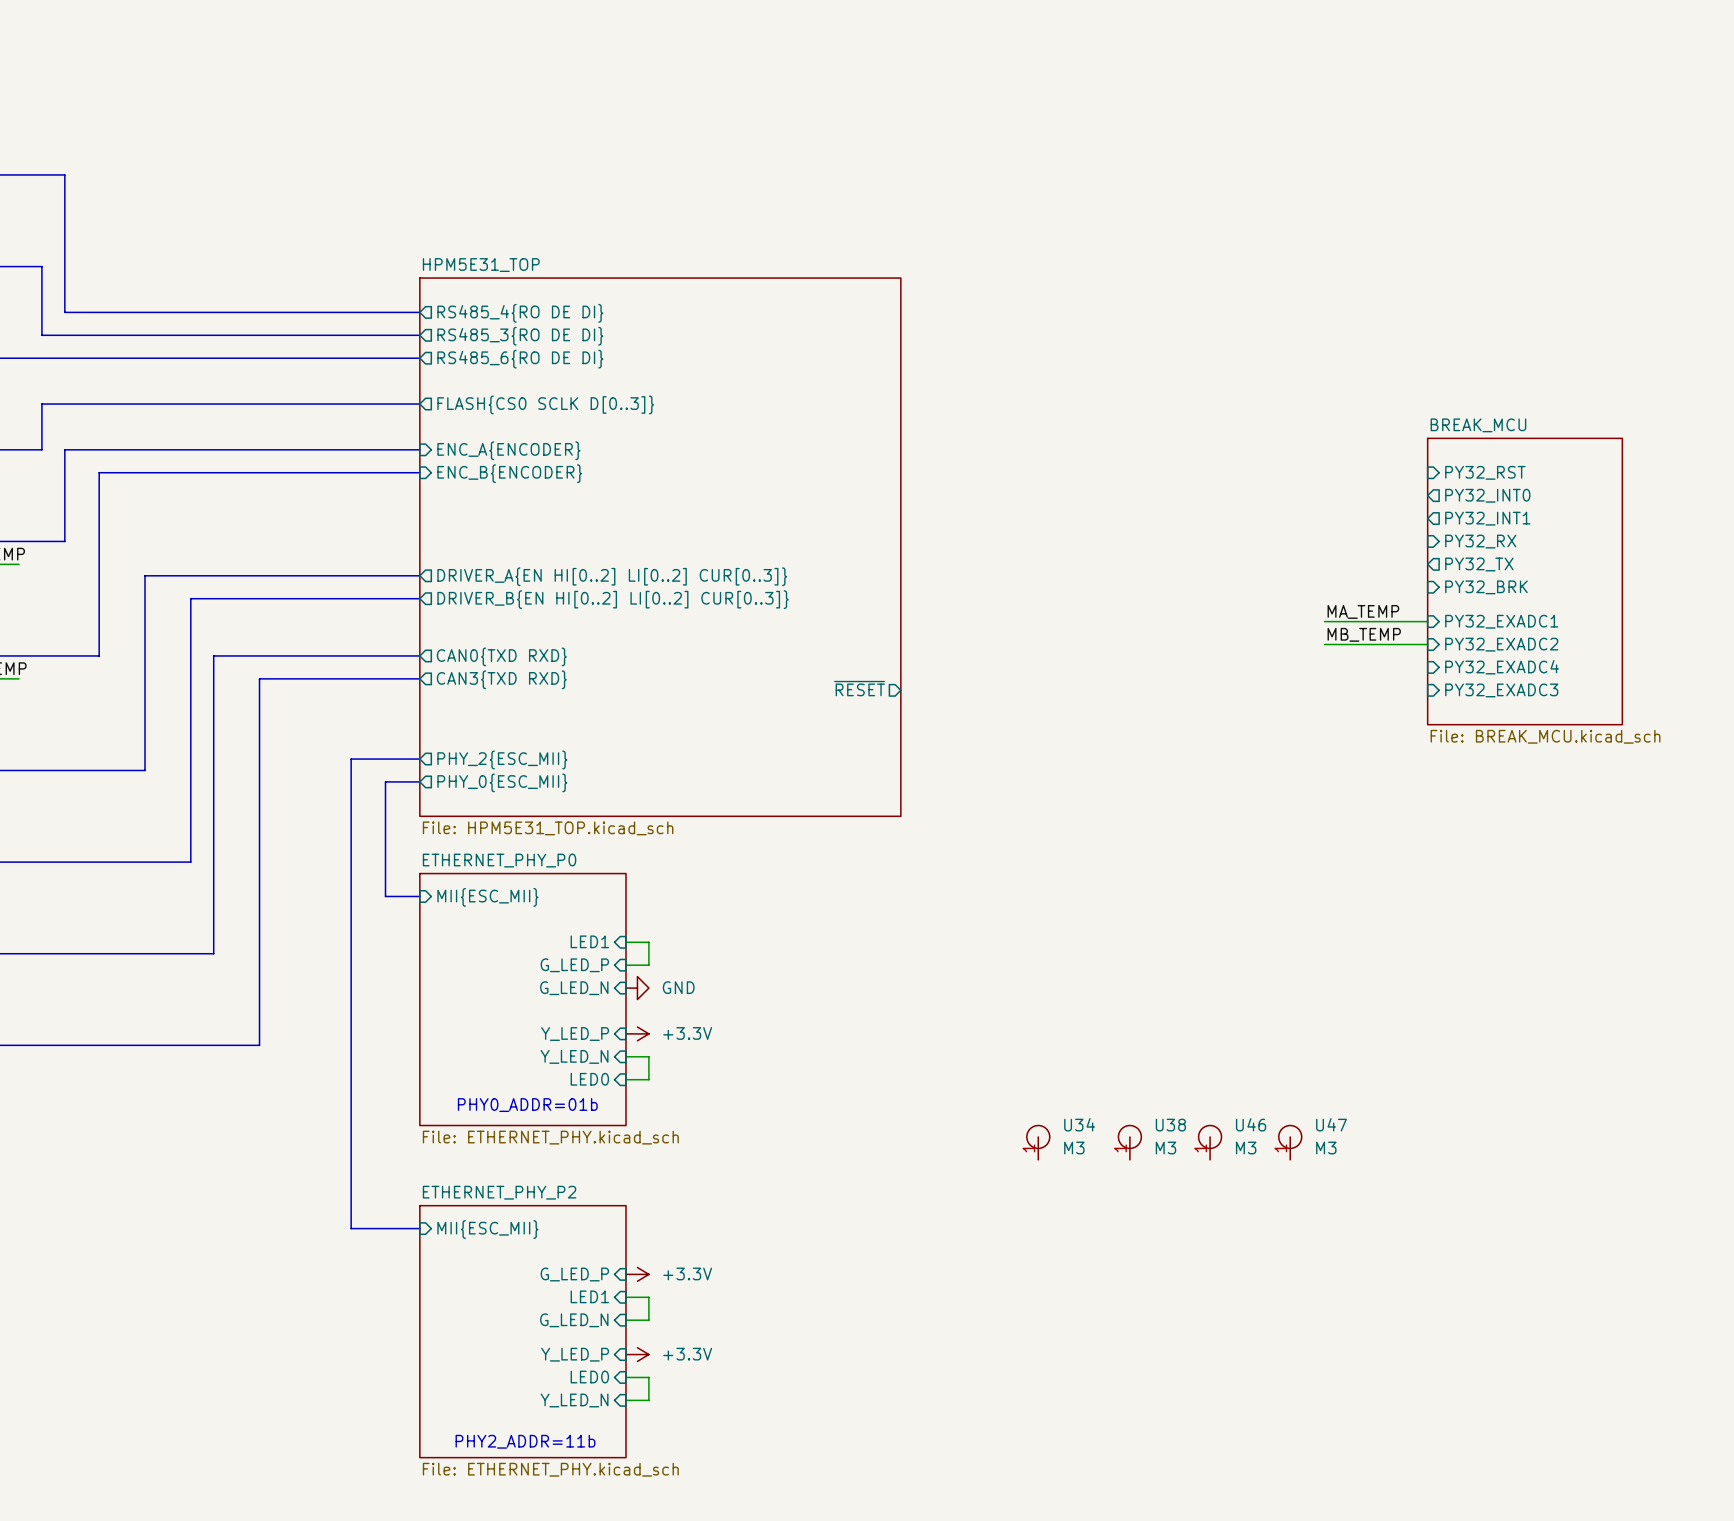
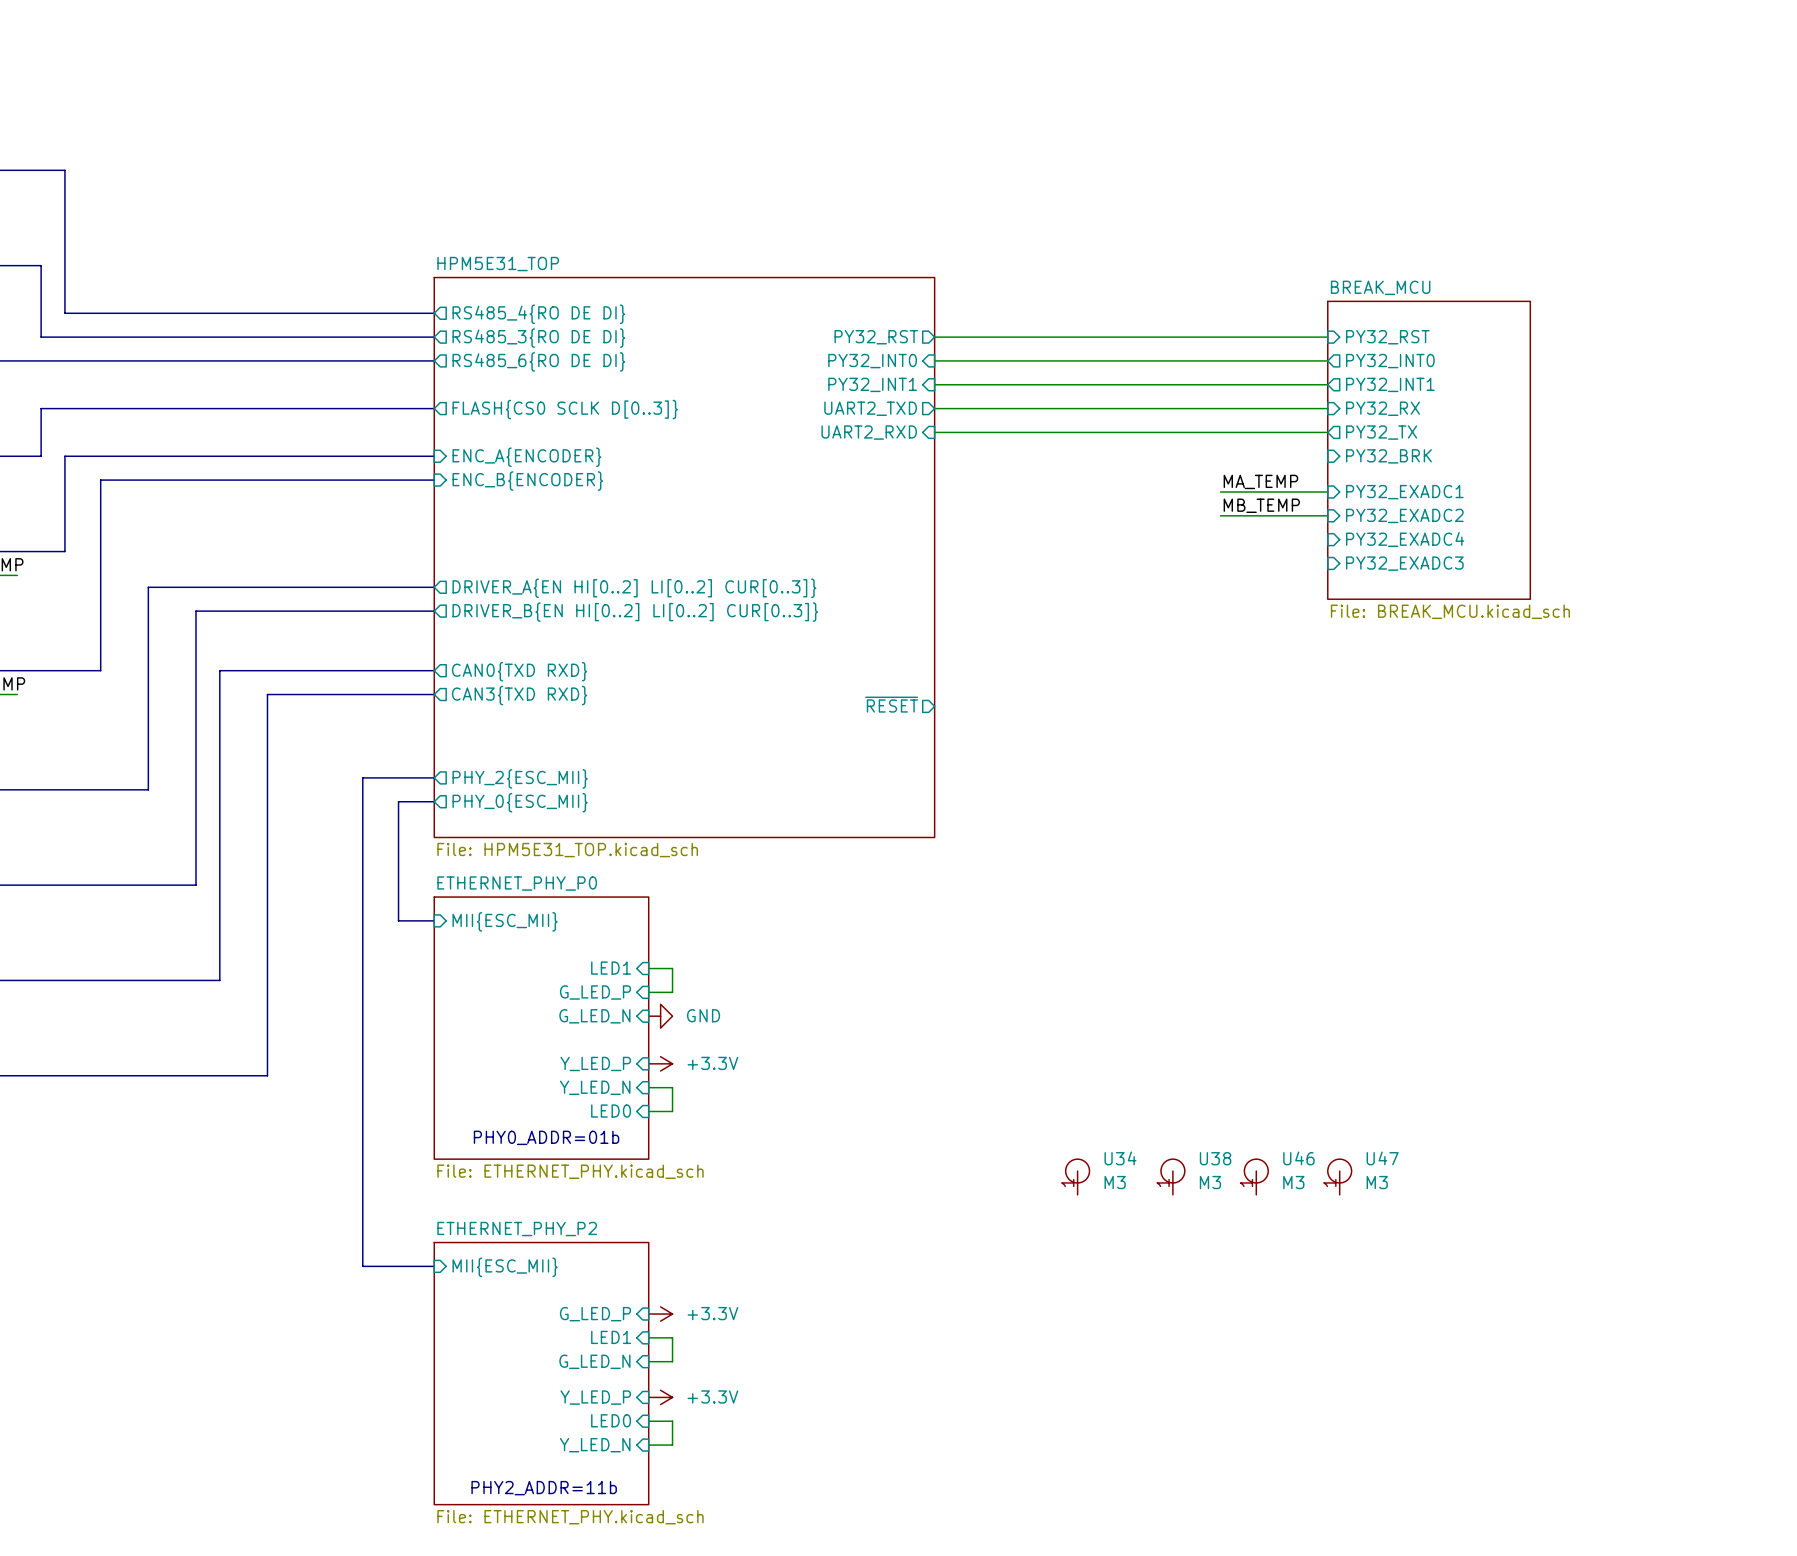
sheet pin: none -> PY32_RST (876, 337)
wire: none -> (934, 337) (1327, 337)
sheet pin: none -> PY32_INT0 (872, 361)
wire: none -> (934, 360) (1327, 360)
sheet pin: none -> PY32_INT1 (872, 384)
wire: none -> (934, 384) (1327, 384)
sheet pin: none -> UART2_TXD (870, 408)
wire: none -> (934, 408) (1327, 408)
wire: none -> (934, 432) (1327, 432)
sheet pin: none -> UART2_RXD (869, 432)
sheet pin position: PY32_RST (1485, 472) -> PY32_RST (1387, 337)
sheet pin position: PY32_INT0 (1487, 495) -> PY32_INT0 (1390, 361)
sheet pin position: PY32_INT1 (1487, 518) -> PY32_INT1 (1390, 384)
sheet pin position: PY32_RX (1480, 541) -> PY32_RX (1383, 408)
sheet pin position: PY32_TX (1479, 564) -> PY32_TX (1381, 432)
sheet BREAK_MCU position: (1525, 581) -> (1429, 450)
sheet pin position: PY32_BRK (1486, 587) -> PY32_BRK (1388, 456)
label position: MA_TEMP (1363, 611) -> MA_TEMP (1260, 481)
wire: (1324, 621) (1427, 621) -> (1220, 491) (1327, 491)
sheet pin position: PY32_EXADC1 (1501, 621) -> PY32_EXADC1 (1404, 492)
label position: MB_TEMP (1364, 634) -> MB_TEMP (1261, 505)
wire: (1324, 644) (1427, 644) -> (1220, 515) (1327, 515)
sheet pin position: PY32_EXADC2 (1501, 644) -> PY32_EXADC2 (1404, 515)
sheet pin position: PY32_EXADC4 (1502, 667) -> PY32_EXADC4 (1405, 539)
sheet pin position: PY32_EXADC3 (1501, 690) -> PY32_EXADC3 (1404, 563)

